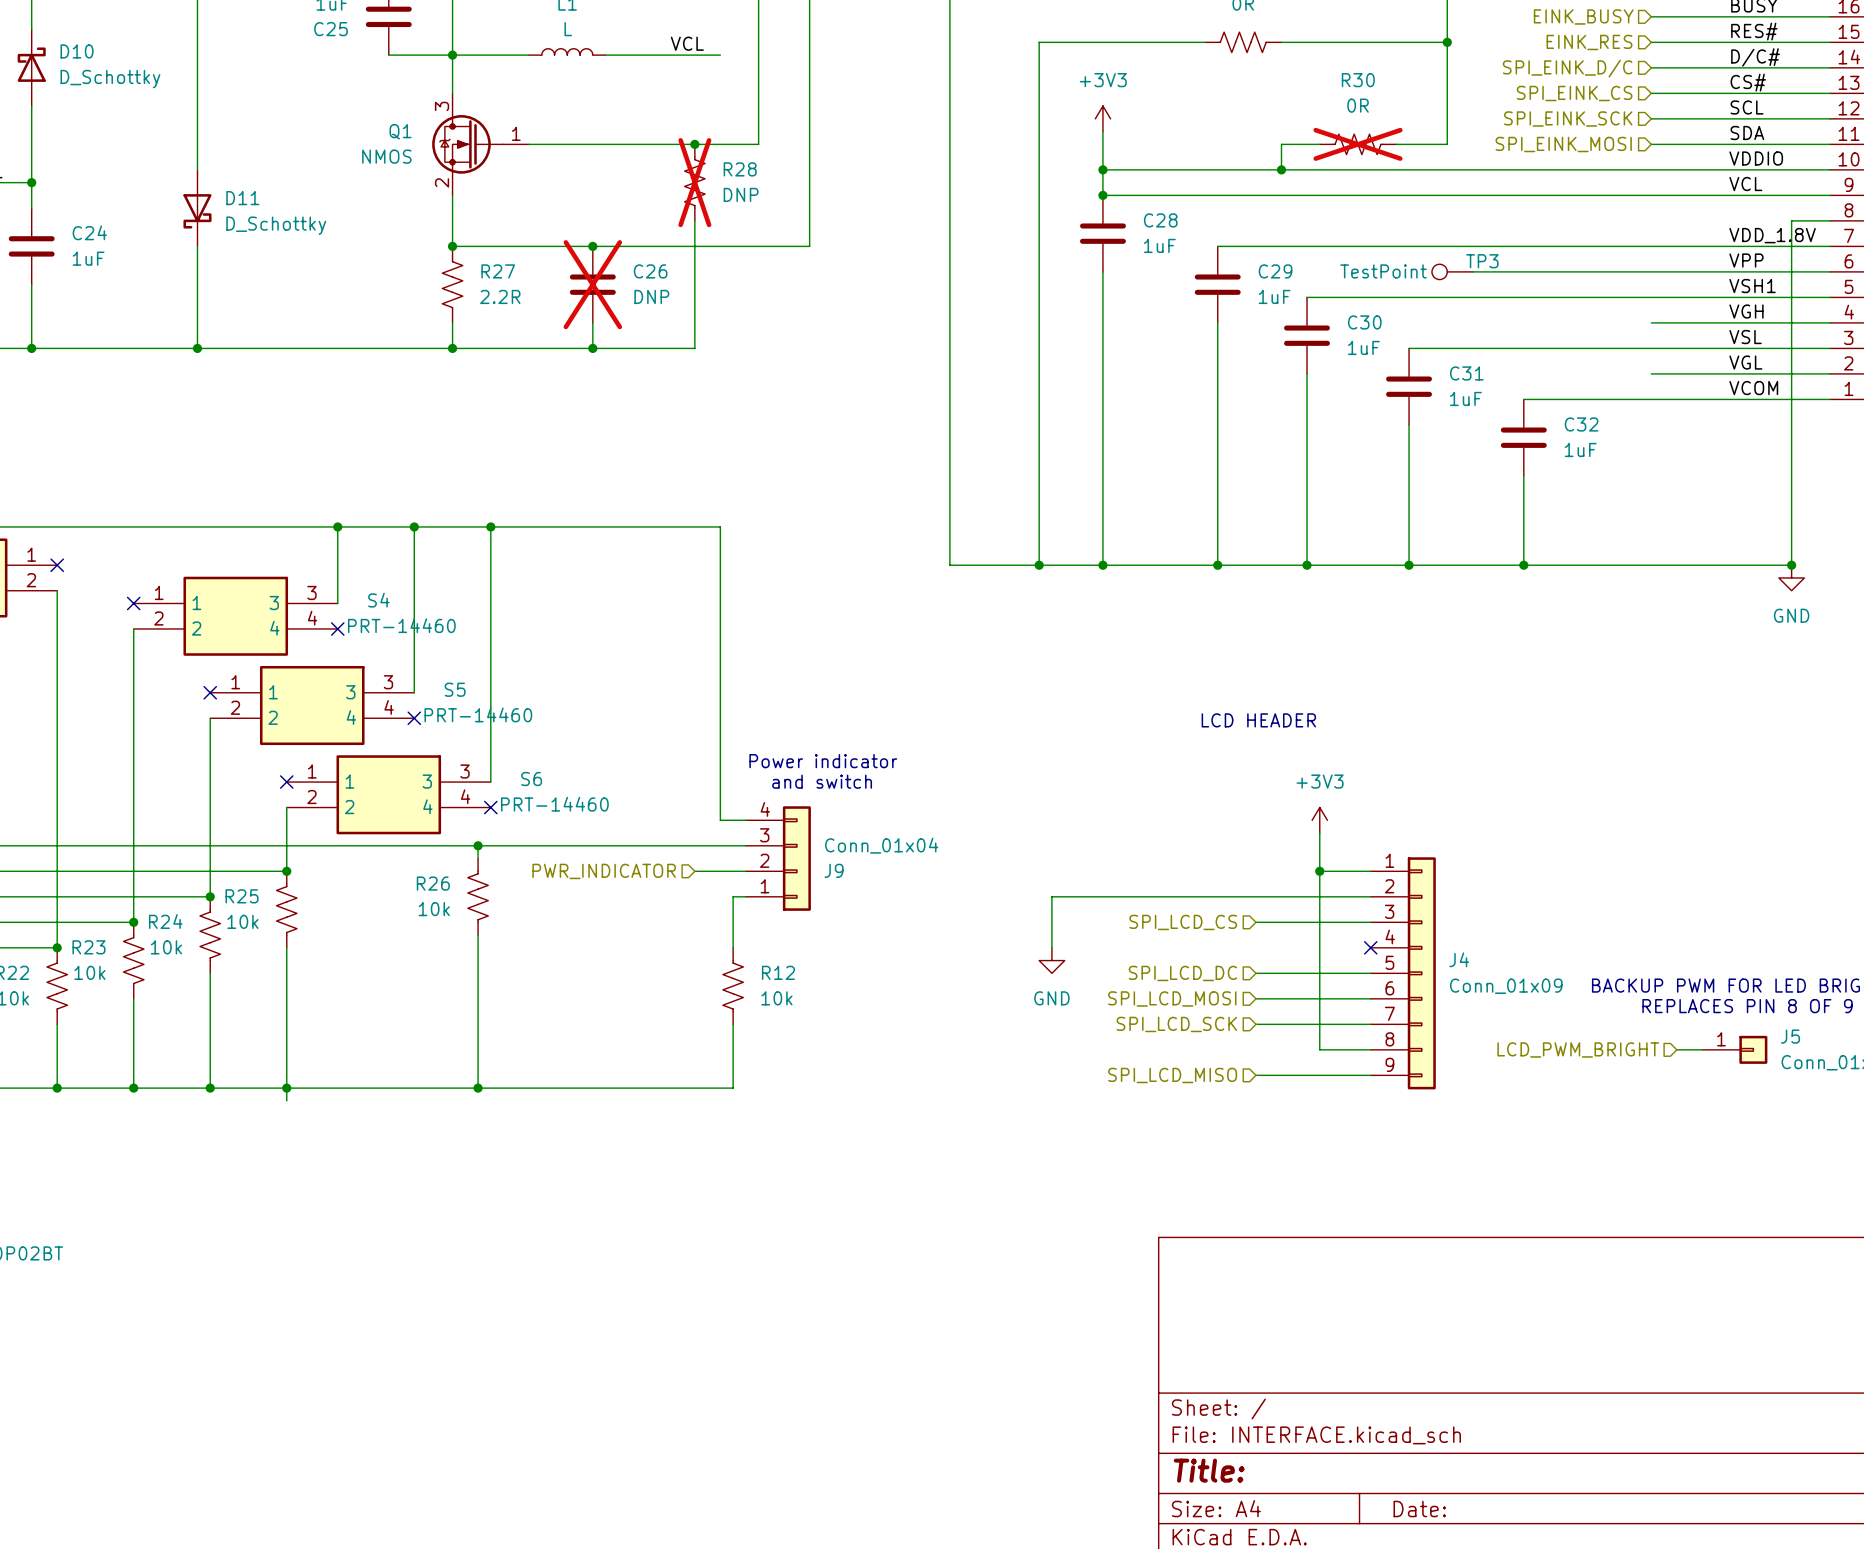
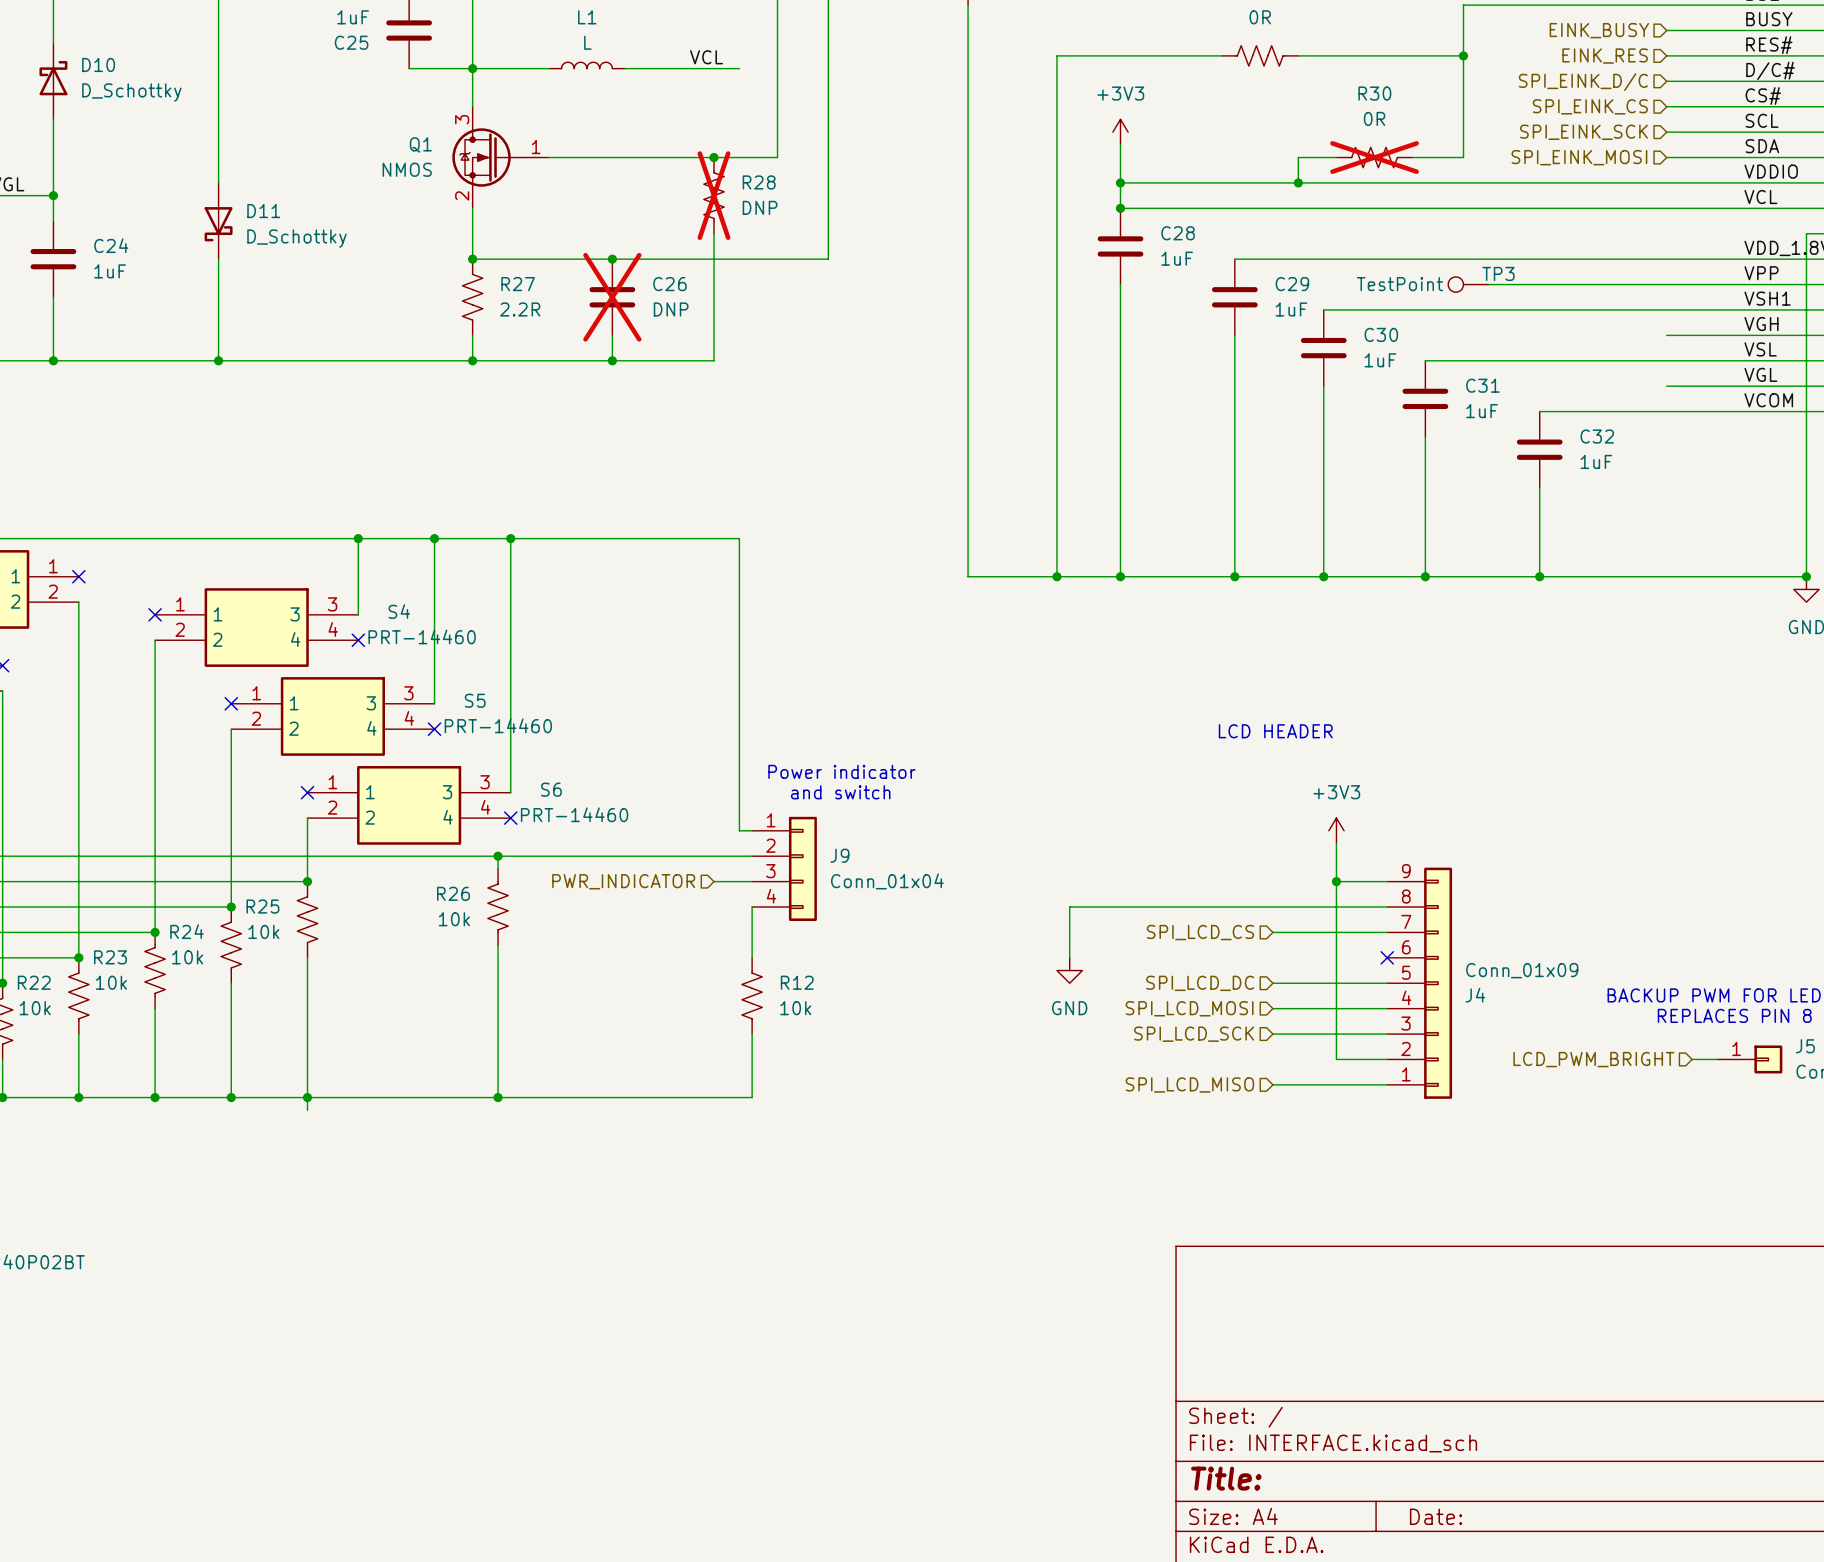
J9 flip: as is (796, 858) -> up-down (802, 868)
J4 flip: as is (1421, 973) -> up-down (1438, 983)

